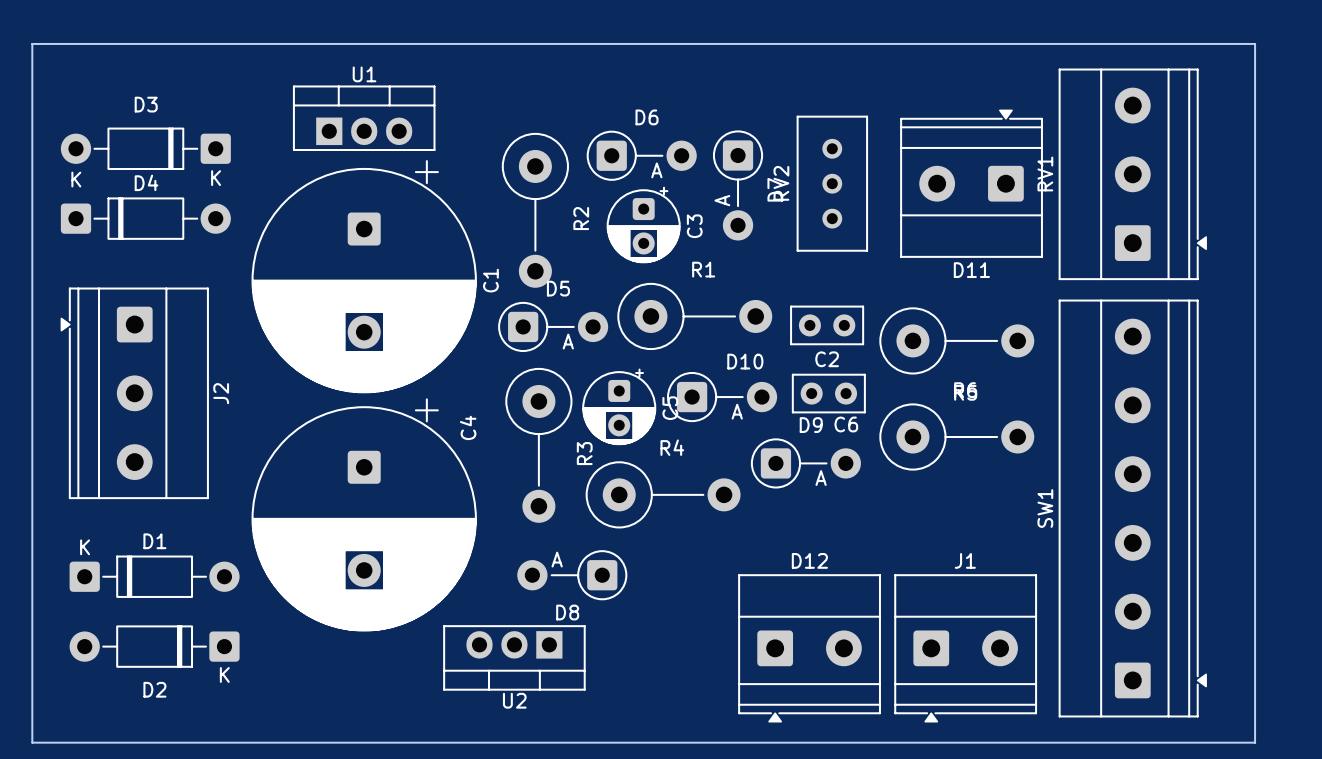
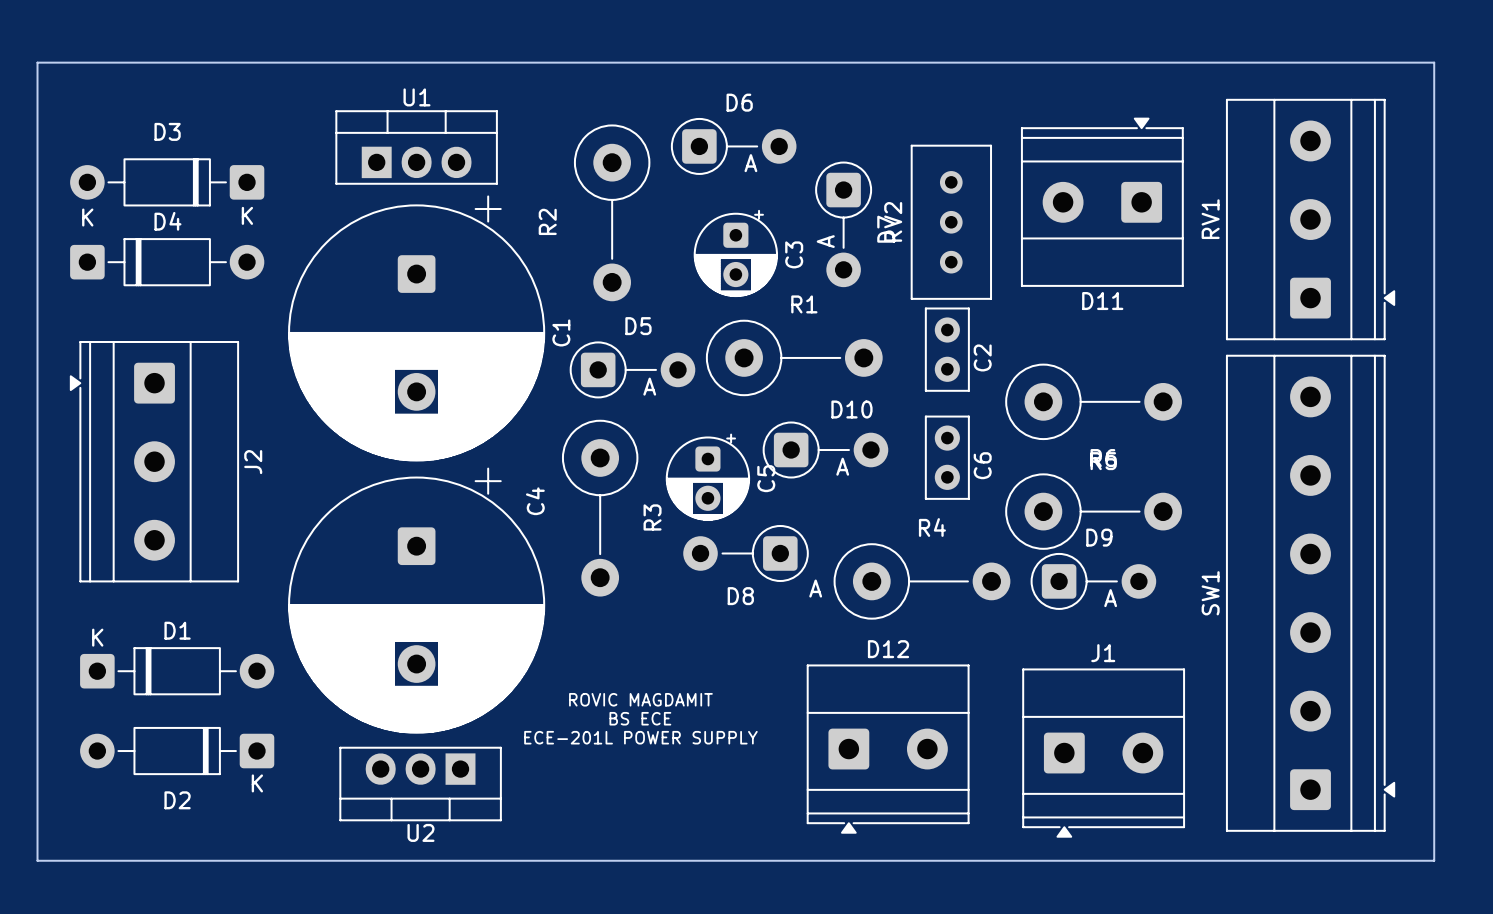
D6 position: (641, 155) -> (733, 146)
RV1 position: (1132, 174) -> (1310, 219)
D11 position: (971, 183) -> (1102, 202)
R2 position: (535, 210) -> (612, 212)
R2 name position: R2 (581, 218) -> R2 (547, 221)
C3 position: (643, 224) -> (735, 253)
R1 position: (694, 316) -> (794, 357)
C2 rotation: 0° (827, 325) -> 90° clockwise (947, 349)
D5 position: (553, 326) -> (632, 369)
C2 name position: C2 (827, 359) -> C2 (982, 357)
C6 rotation: 0° (828, 393) -> 90° clockwise (947, 457)
D10 position: (722, 397) -> (825, 450)
C6 name position: C6 (846, 424) -> C6 (982, 465)
R3 position: (538, 445) -> (600, 508)
D9 position: (806, 463) -> (1093, 581)
R4 position: (663, 494) -> (922, 581)
SW1 position: (1132, 508) -> (1310, 593)
D8 text position: A (557, 559) -> A (815, 588)
D8 position: (572, 575) -> (746, 553)
text: none -> ROVIC MAGDAMIT (640, 699)
text: none -> BS ECE (640, 718)
text: none -> ECE-201L POWER SUPPLY (640, 737)
D12 position: (809, 648) -> (888, 749)
U2 position: (514, 657) -> (420, 784)

